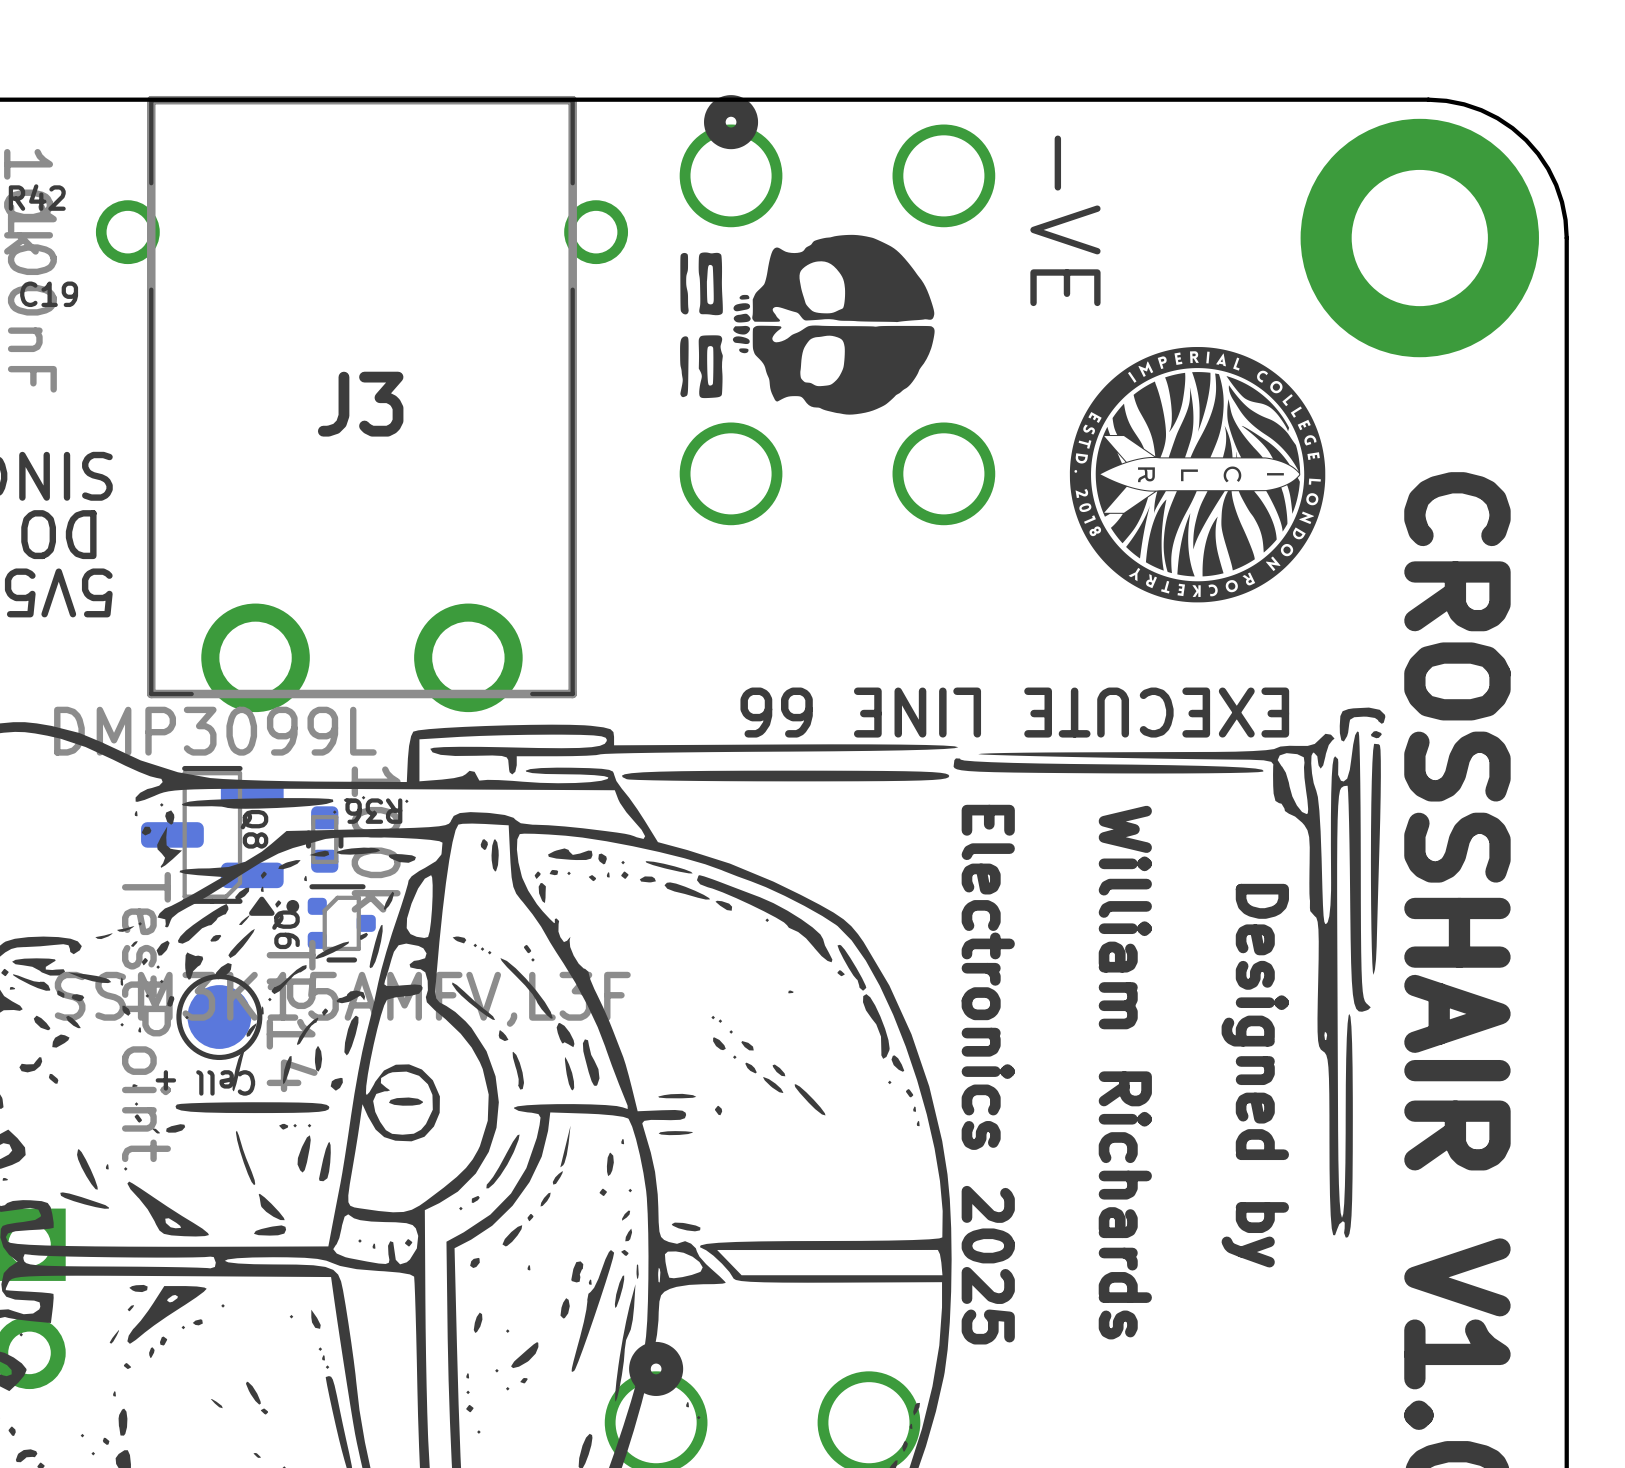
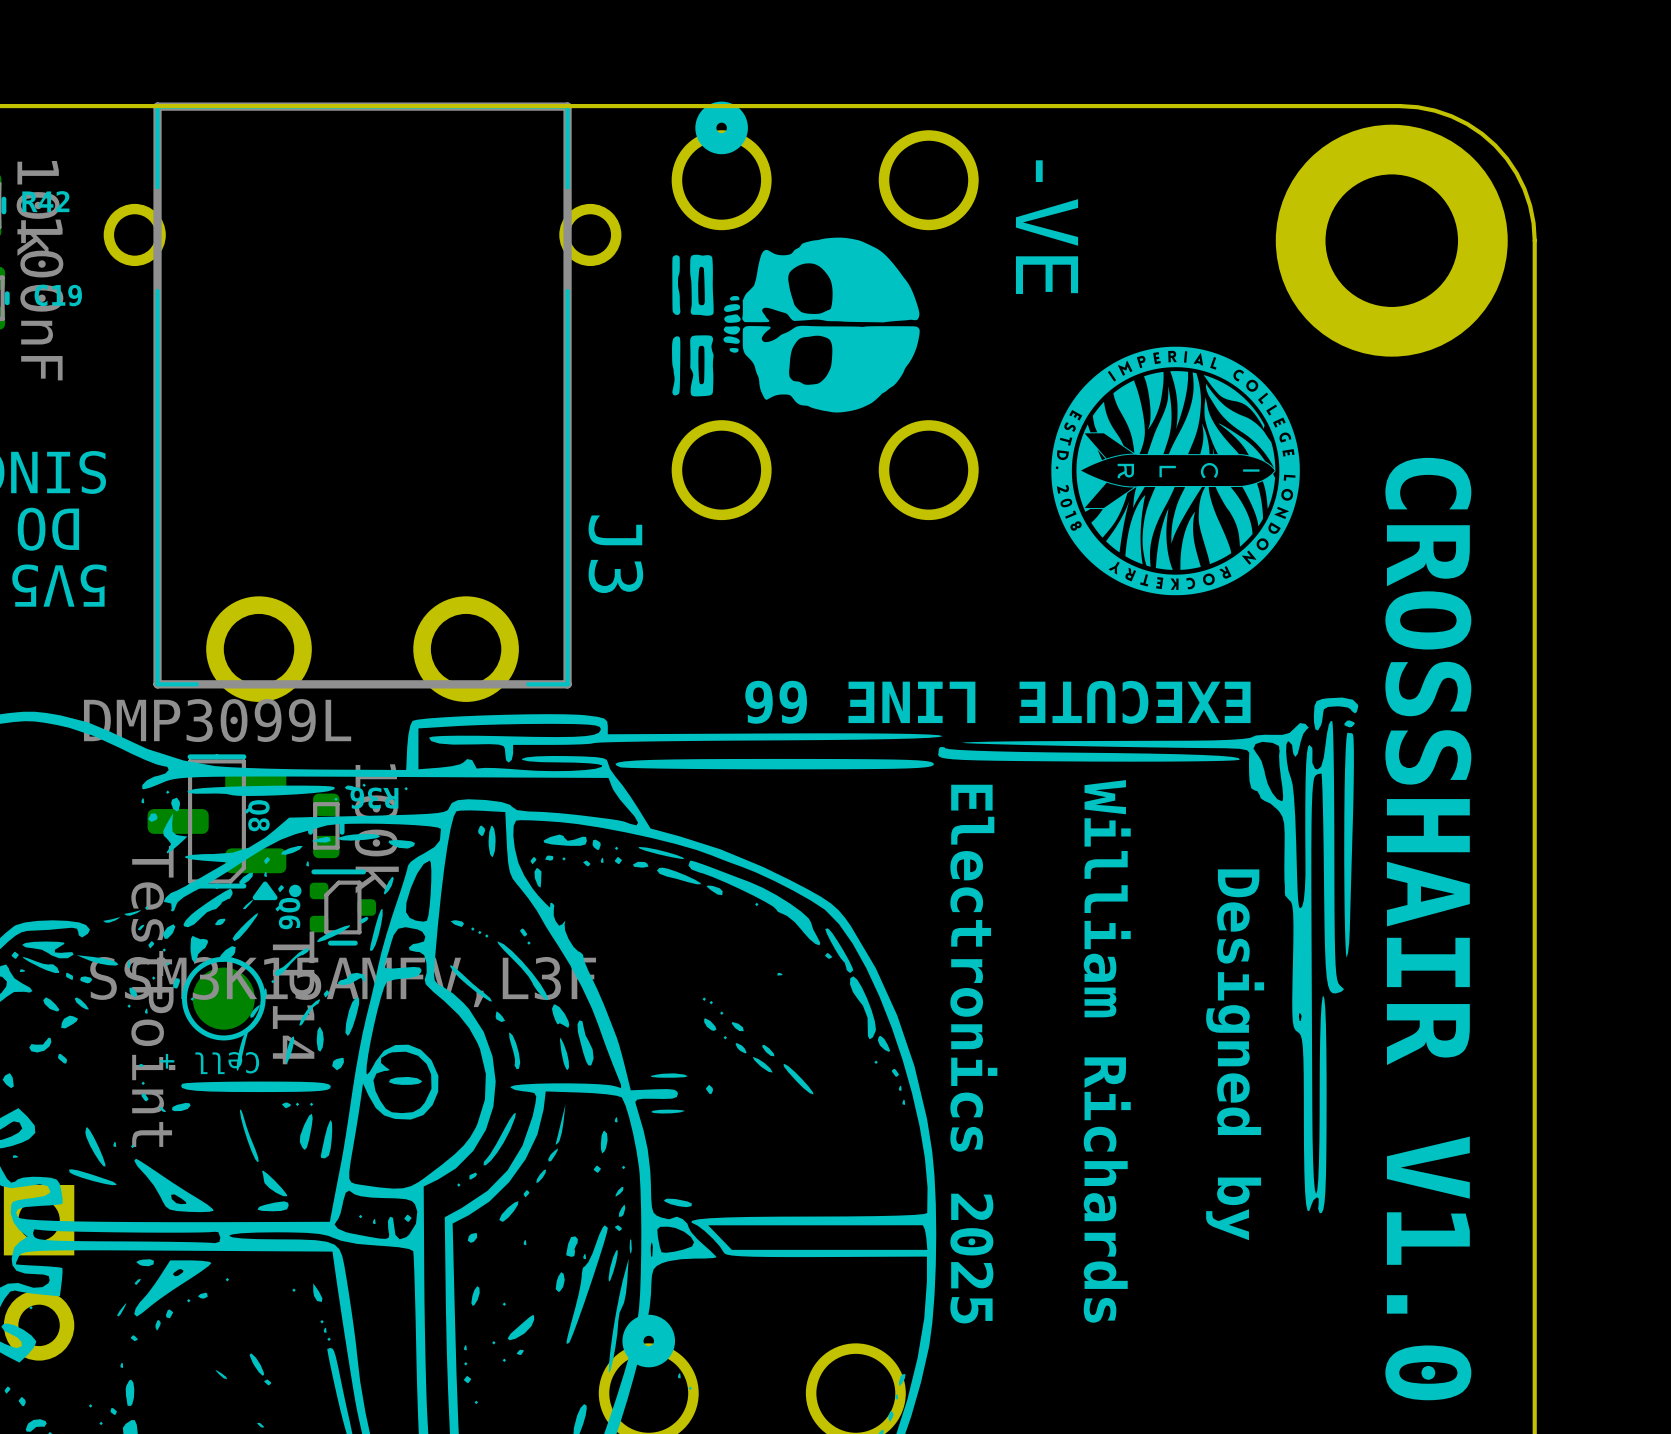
J3 name rotation: 0° (360, 404) -> 90° clockwise (615, 554)
J3 name position: J3 (360, 404) -> J3 (615, 554)

